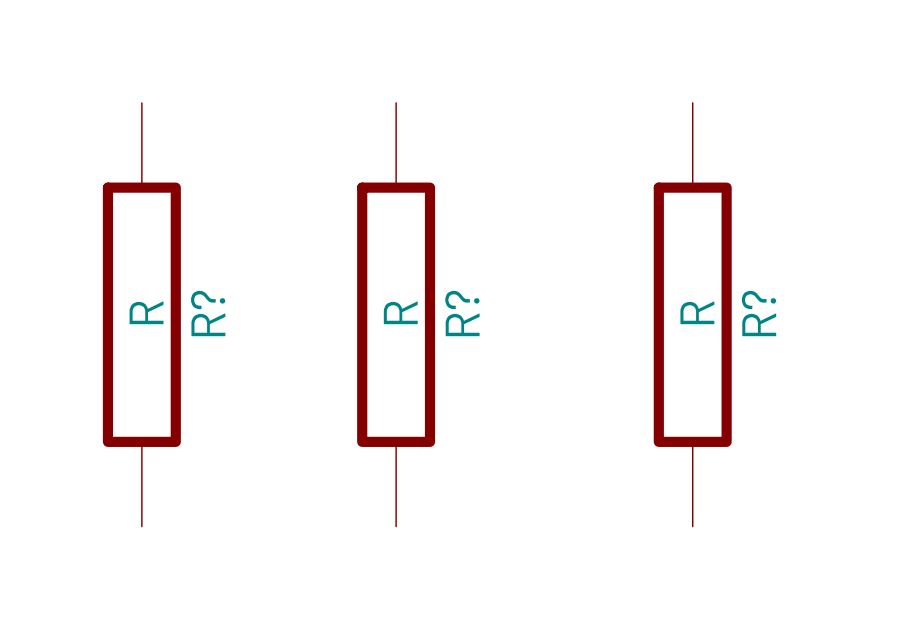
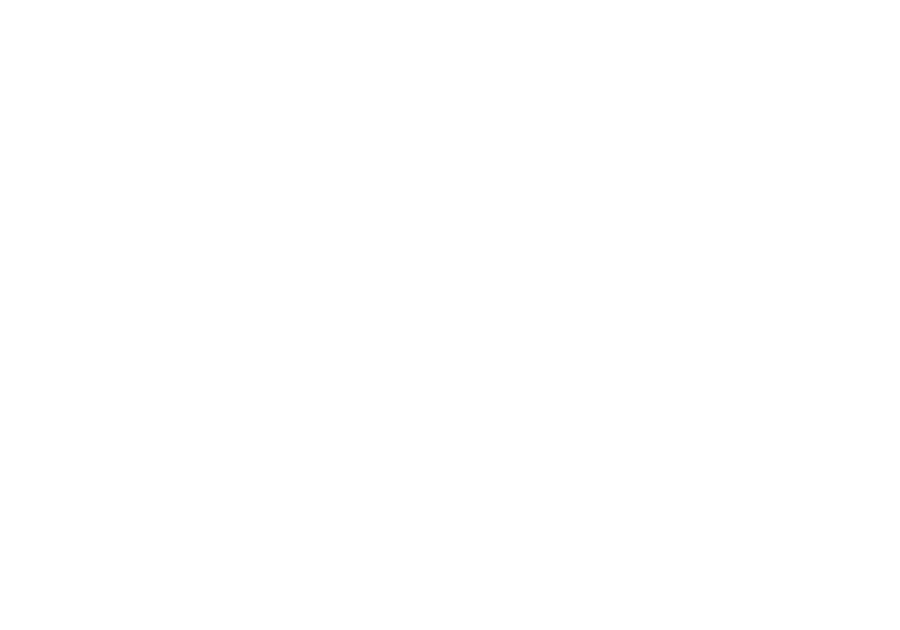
R?: R (141, 314) -> none
R?: R (396, 314) -> none
R?: R (692, 314) -> none

